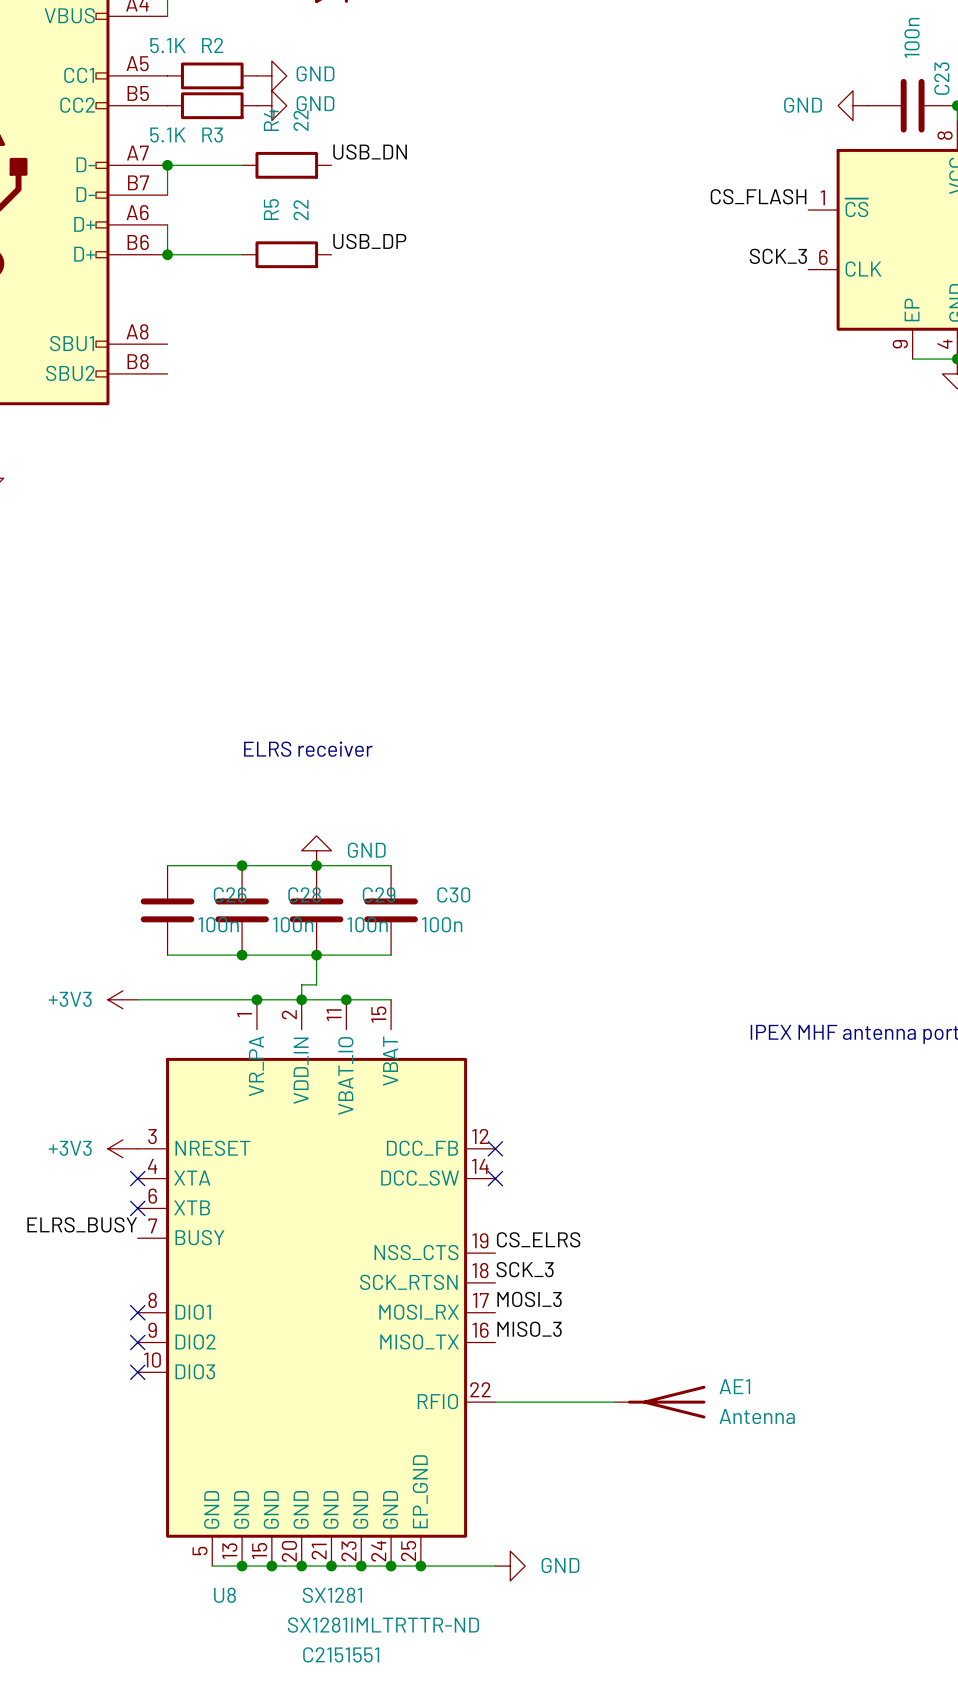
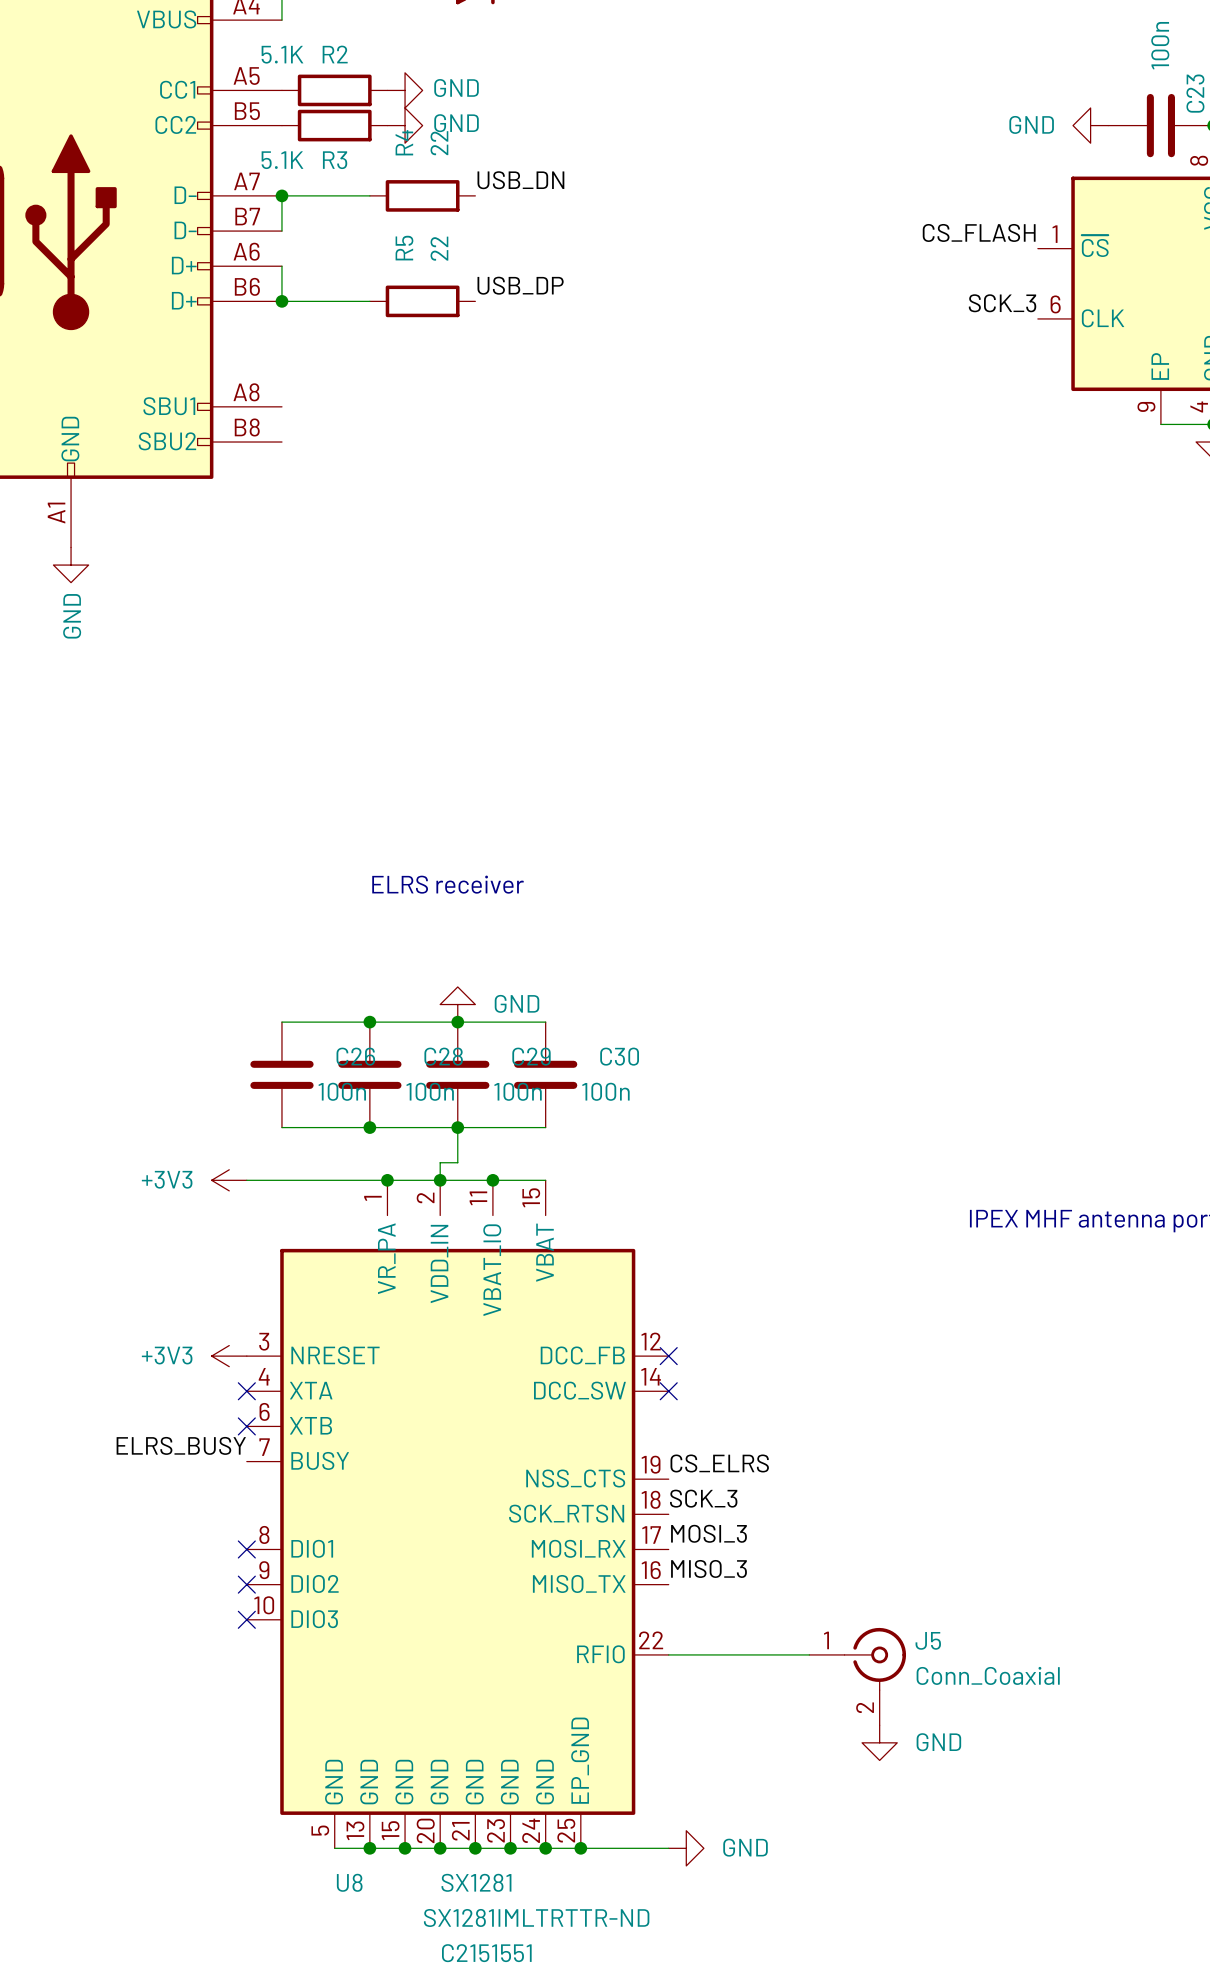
AE1: Antenna (660, 1402) -> none
J5: none -> Conn_Coaxial (857, 1676)
power symbol: none -> GND (879, 1742)

